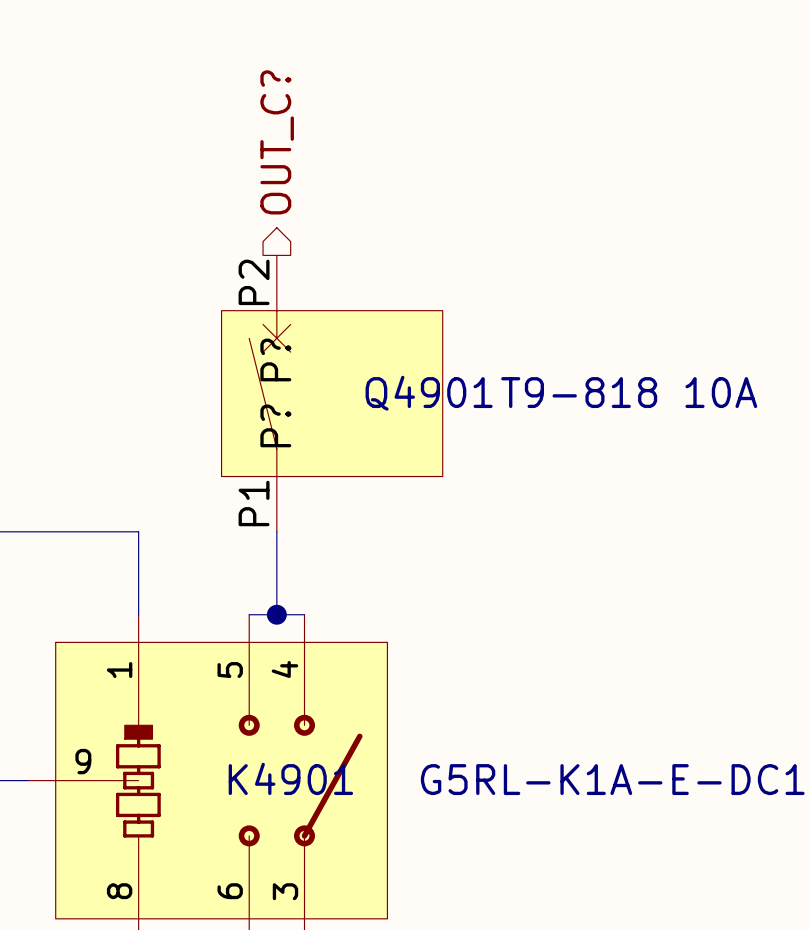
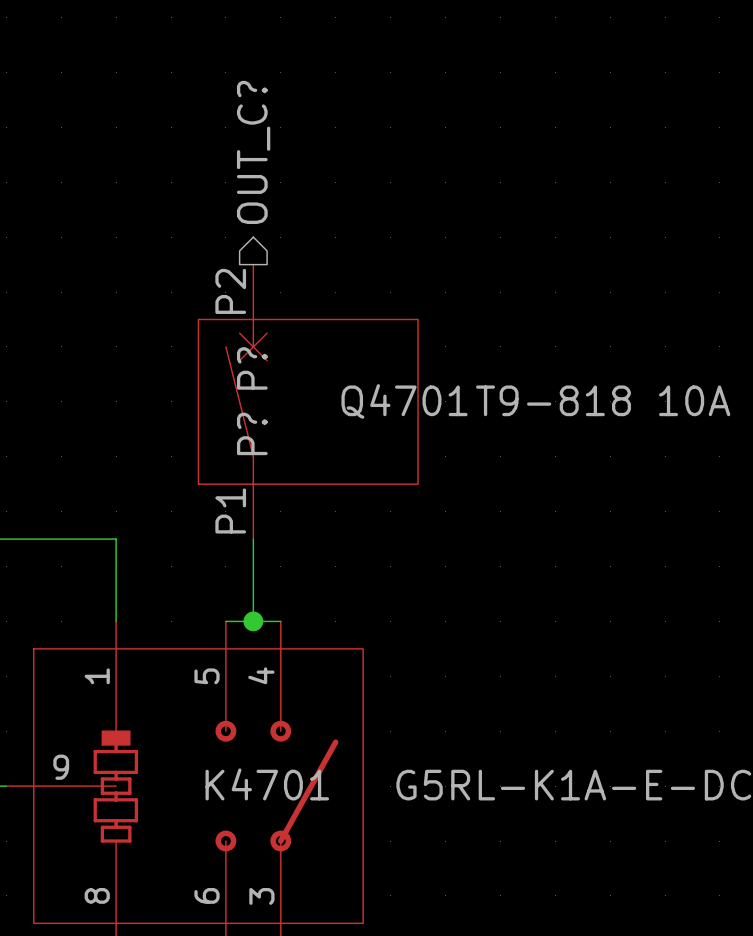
Q4901 name: Q4901 (429, 393) -> Q4701 (404, 401)
K4901 name: K4901 (290, 778) -> K4701 (267, 784)

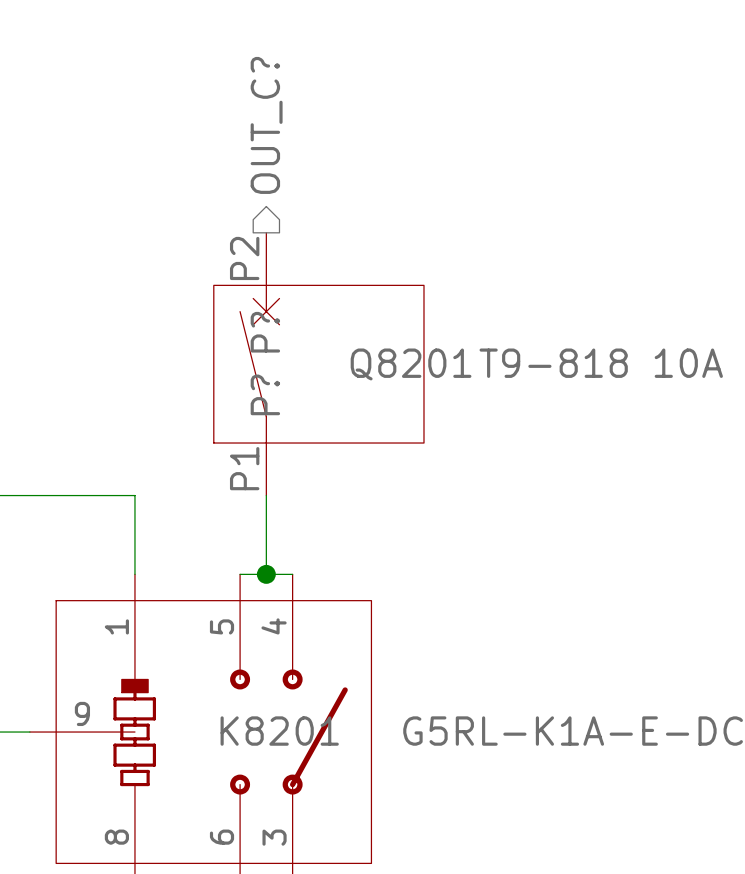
Q4701 name: Q4701 (404, 401) -> Q8201 (411, 364)
K4701 name: K4701 (267, 784) -> K8201 (279, 731)

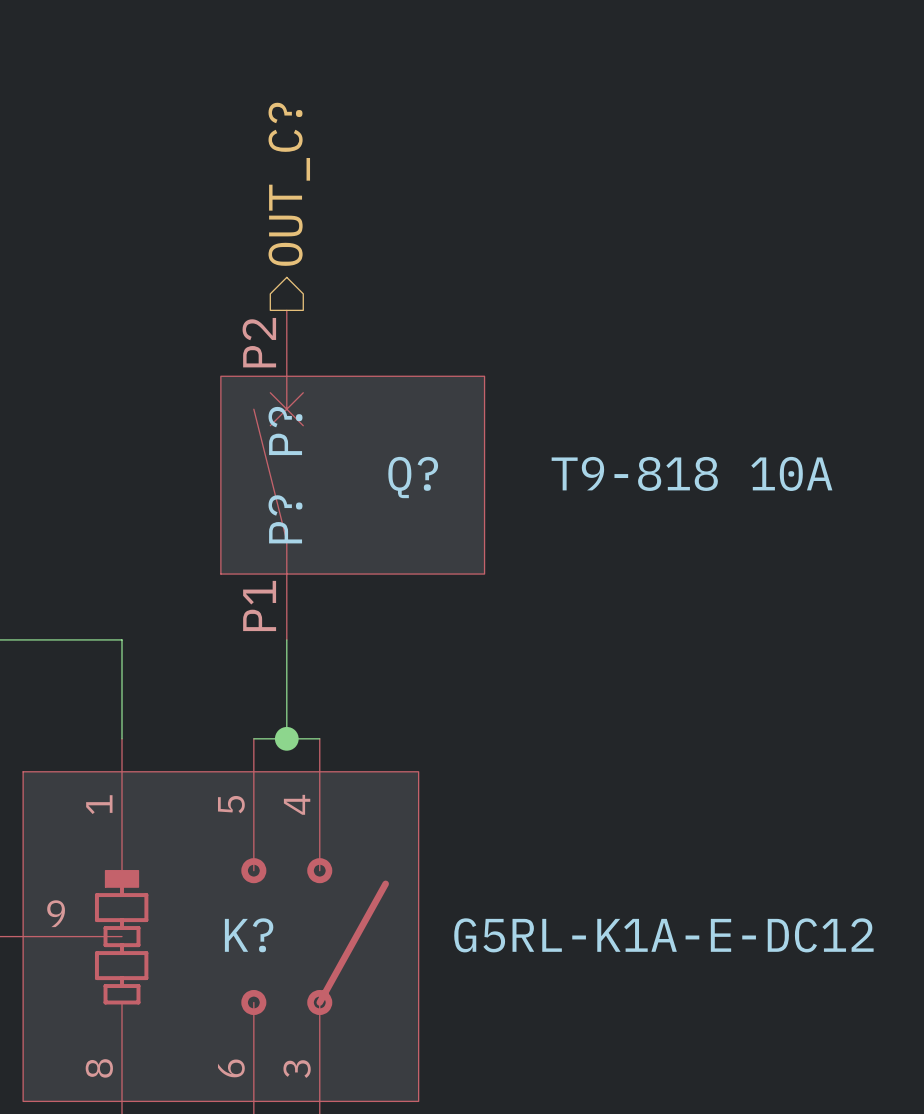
Q8201 name: Q8201 (411, 364) -> Q? (413, 477)
K8201 name: K8201 (279, 731) -> K? (249, 935)

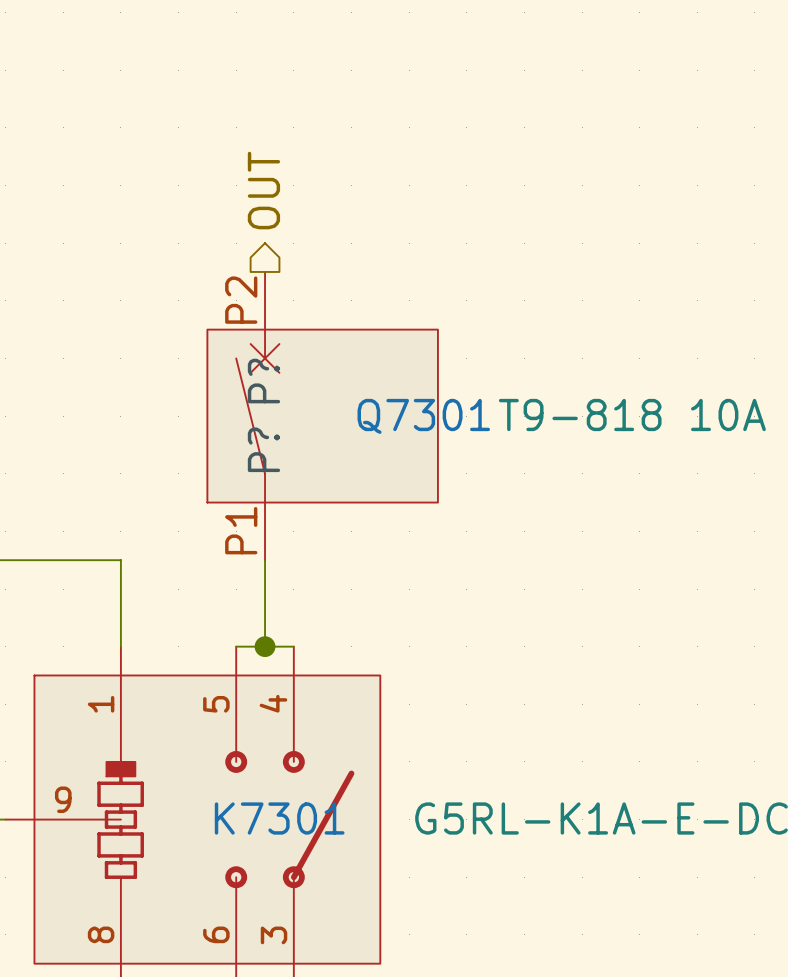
hierarchical label: OUT_C? (289, 184) -> OUT (263, 190)
Q? name: Q? (413, 477) -> Q7301 (423, 416)
K? name: K? (249, 935) -> K7301 (279, 818)

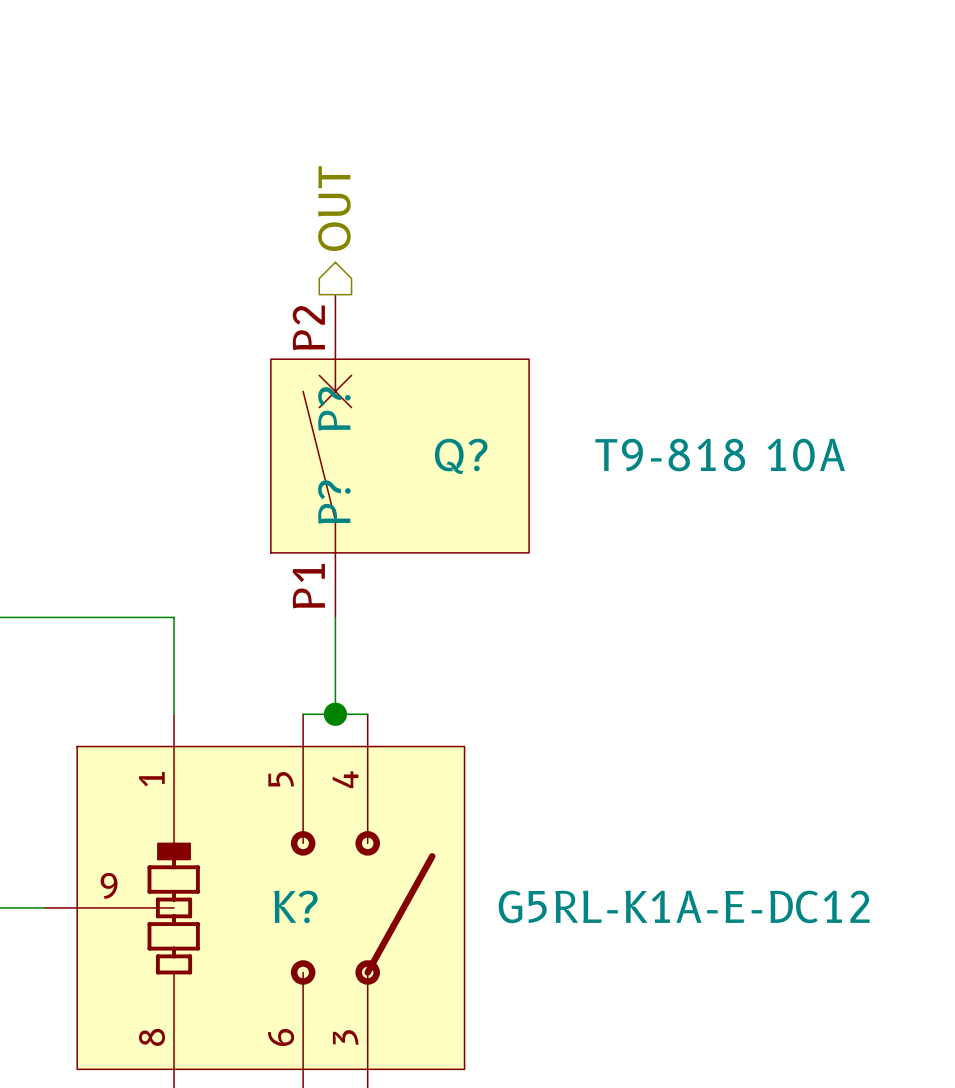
Q7301 name: Q7301 (423, 416) -> Q? (461, 456)
K7301 name: K7301 (279, 818) -> K? (295, 906)

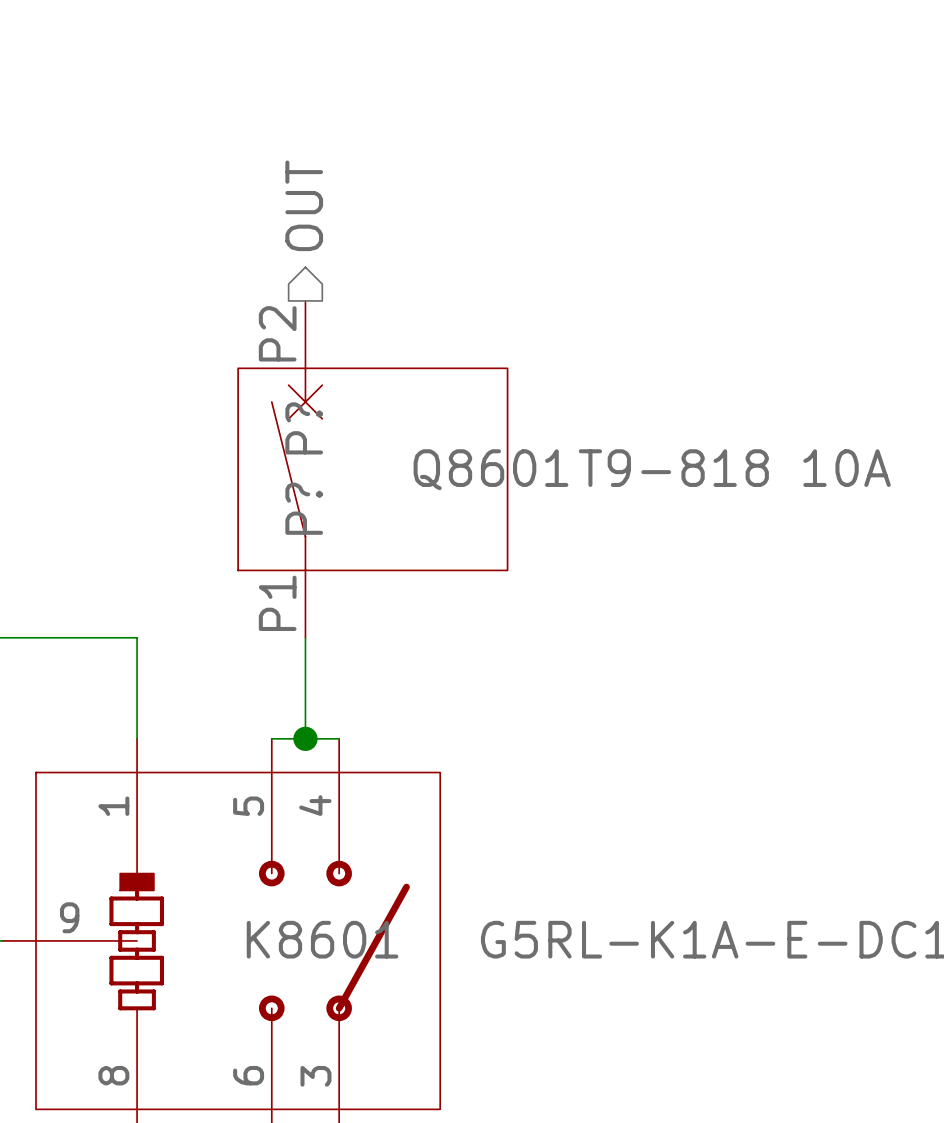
Q? name: Q? (461, 456) -> Q8601 (490, 469)
K? name: K? (295, 906) -> K8601 (322, 939)

